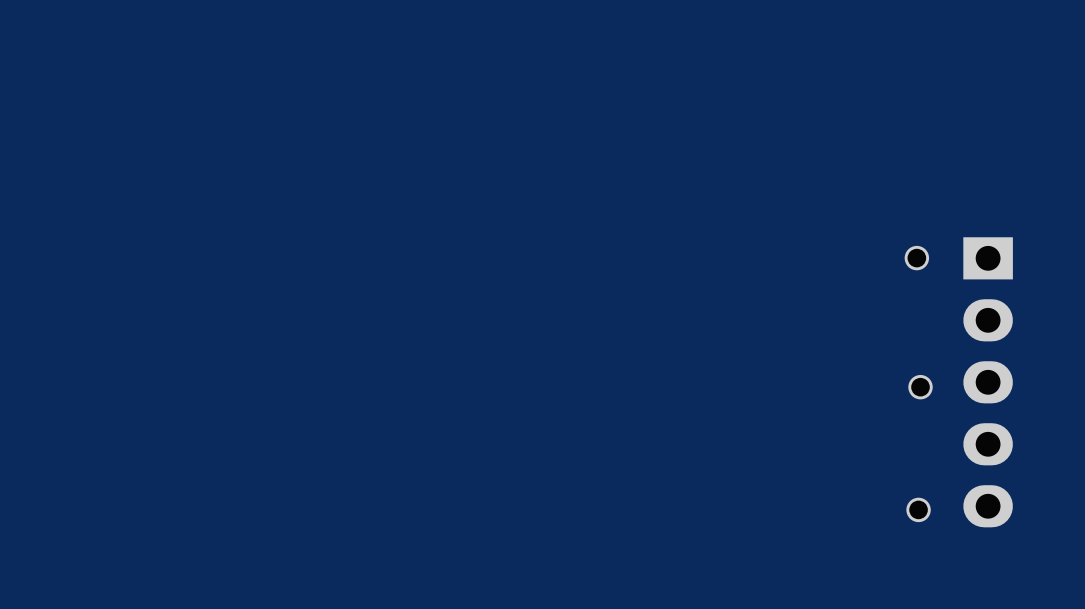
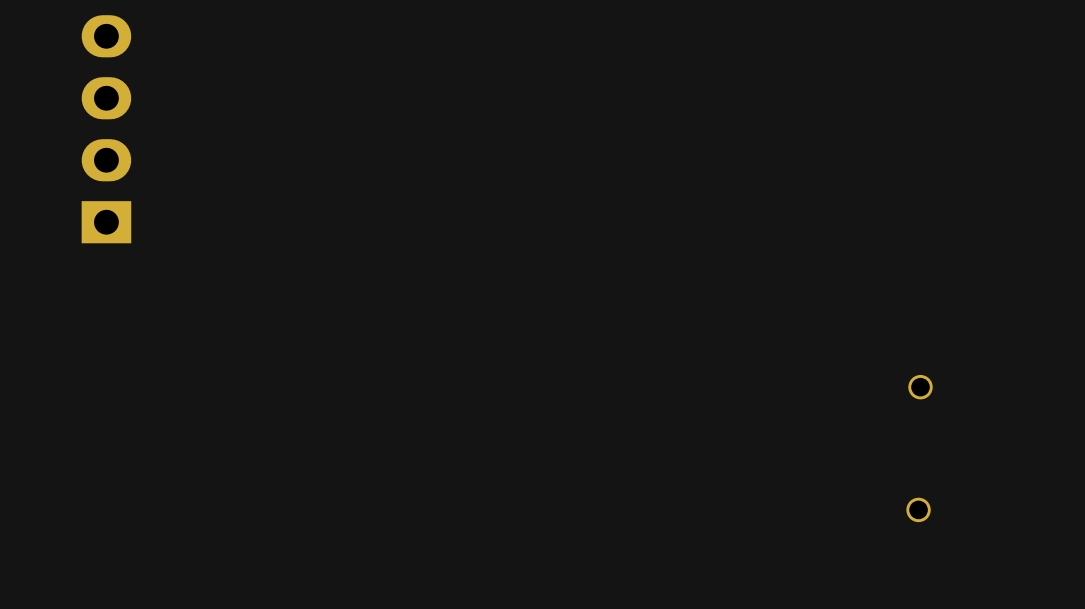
part: none -> (106, 129)
part: (916, 258) -> none
part: (988, 382) -> none

